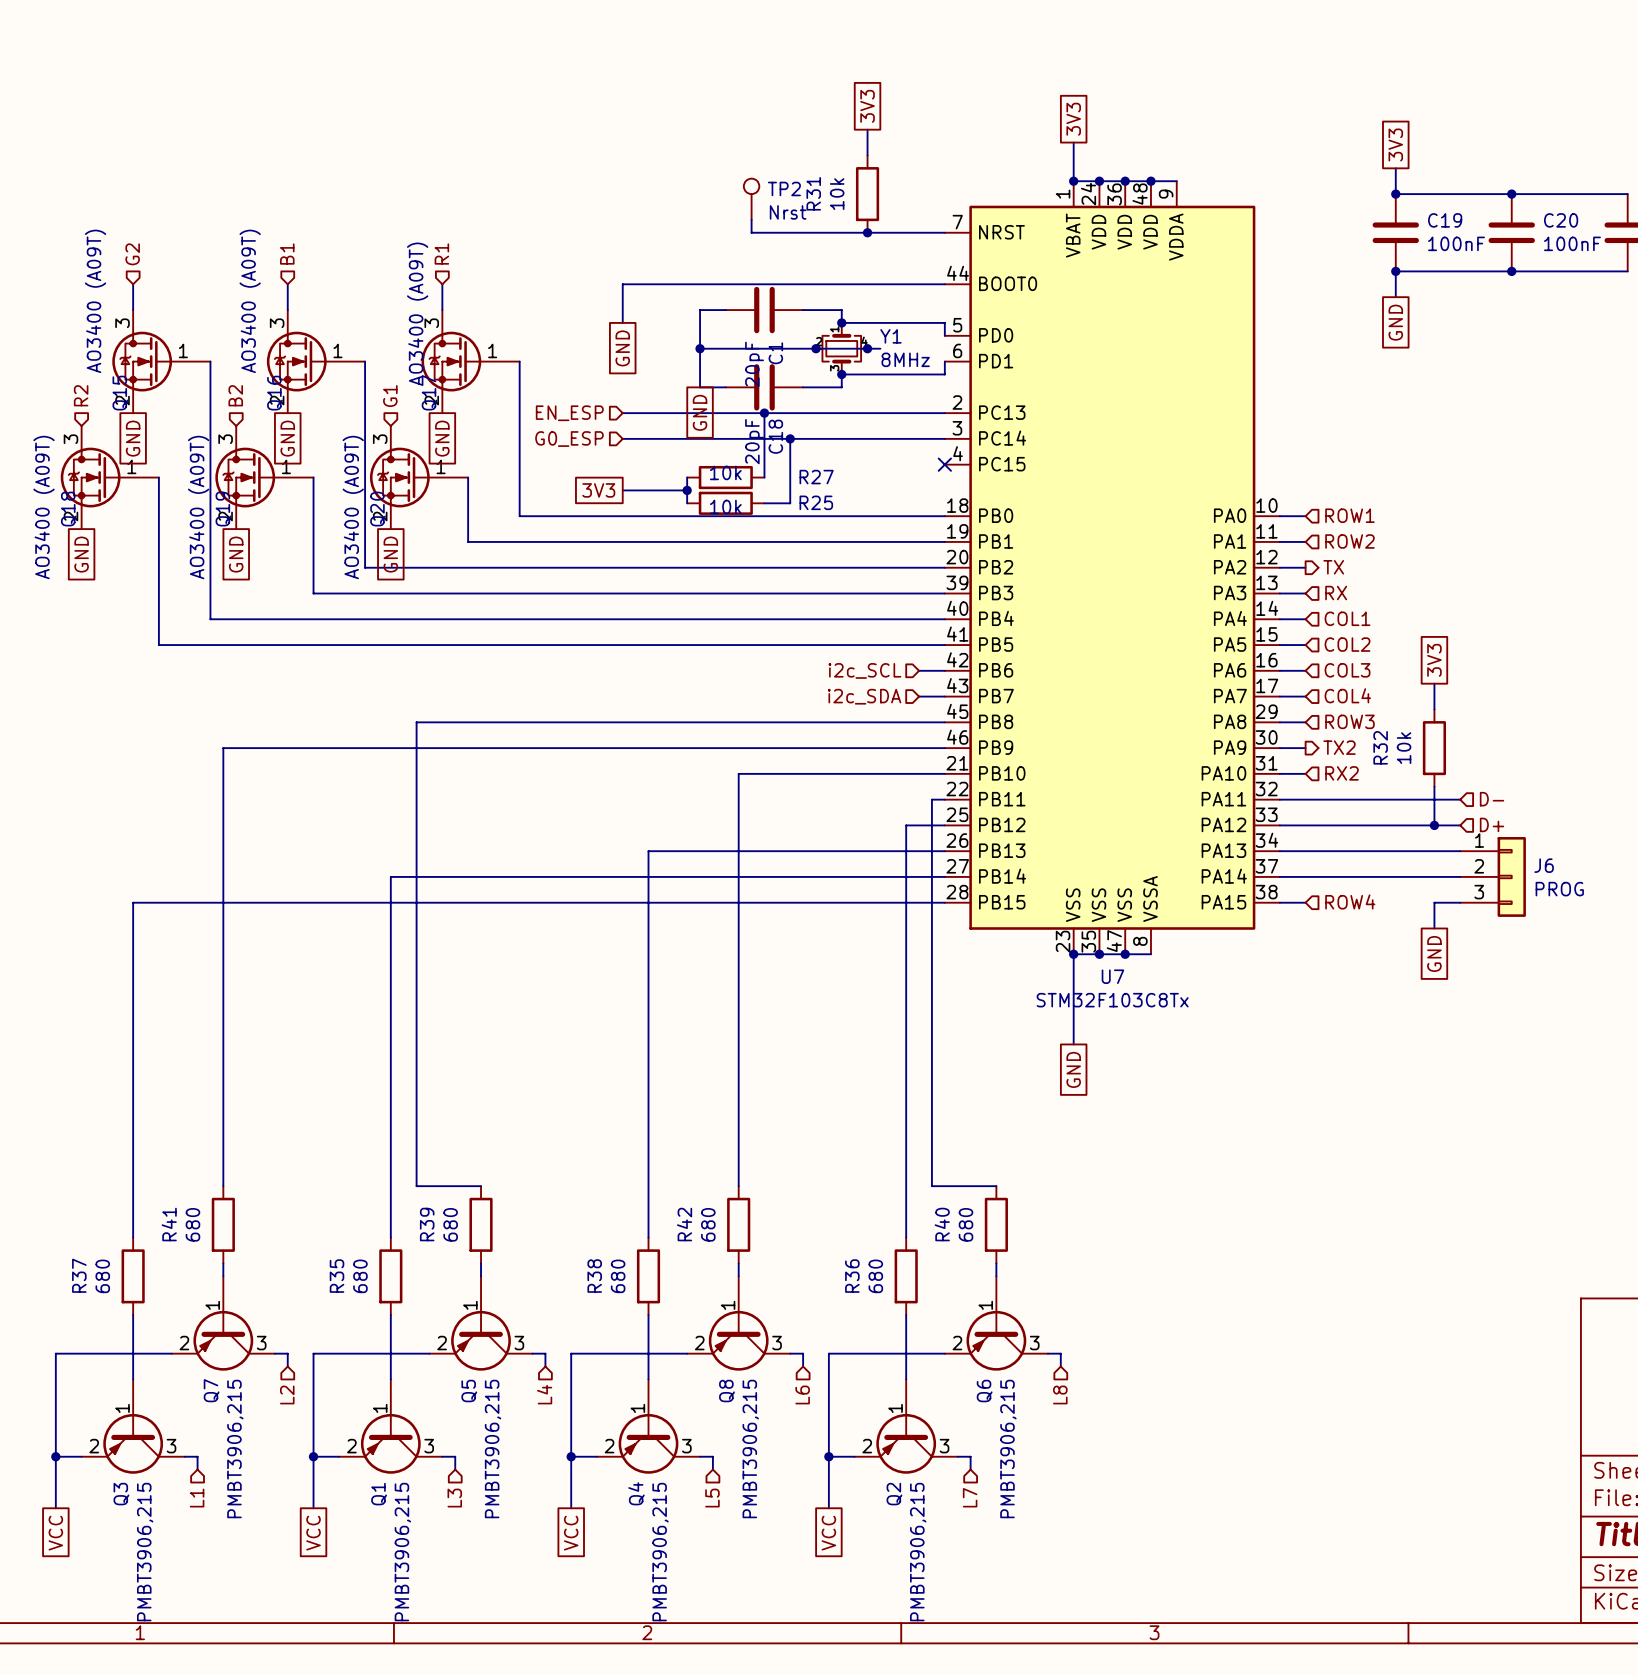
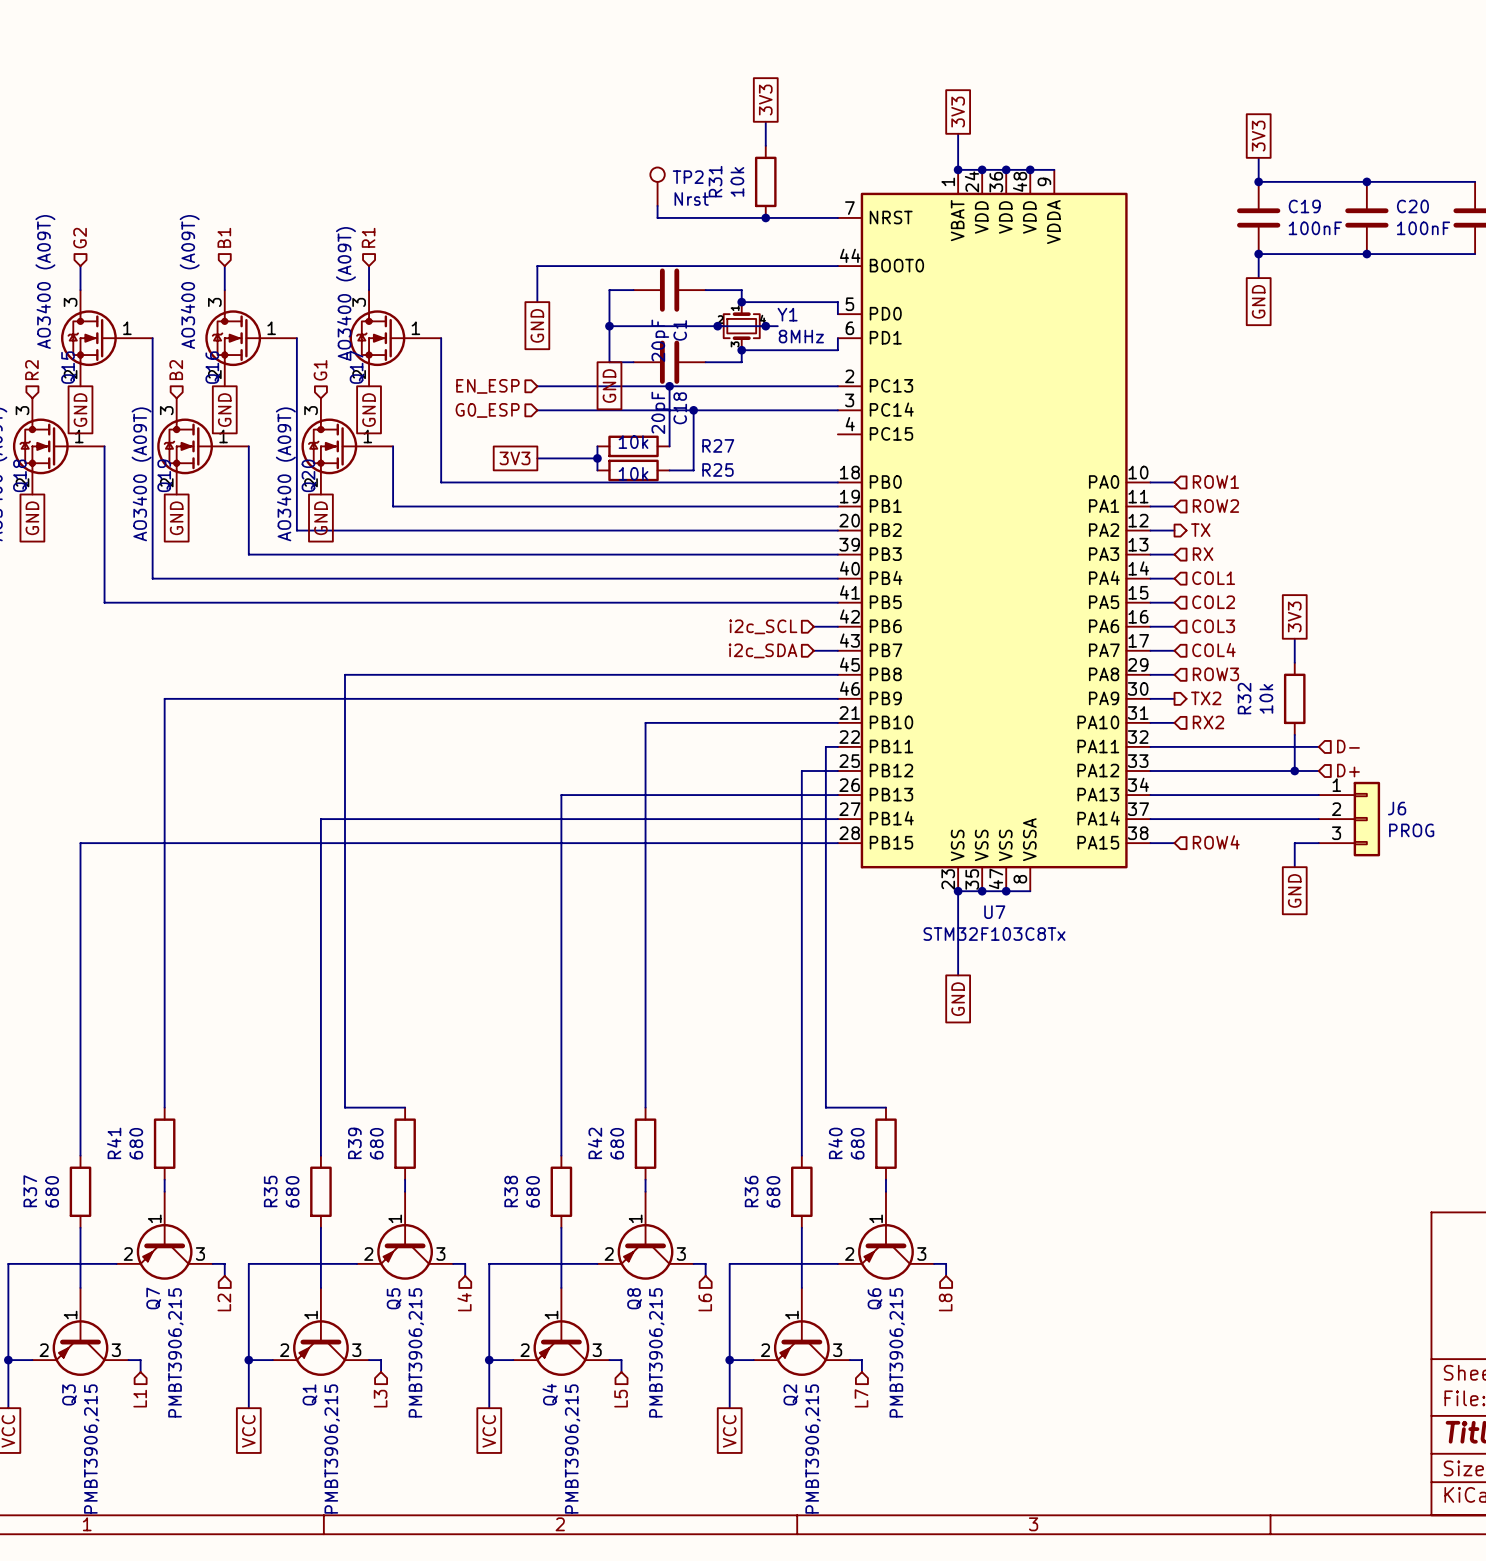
no-connect mark: (944, 464) -> none

